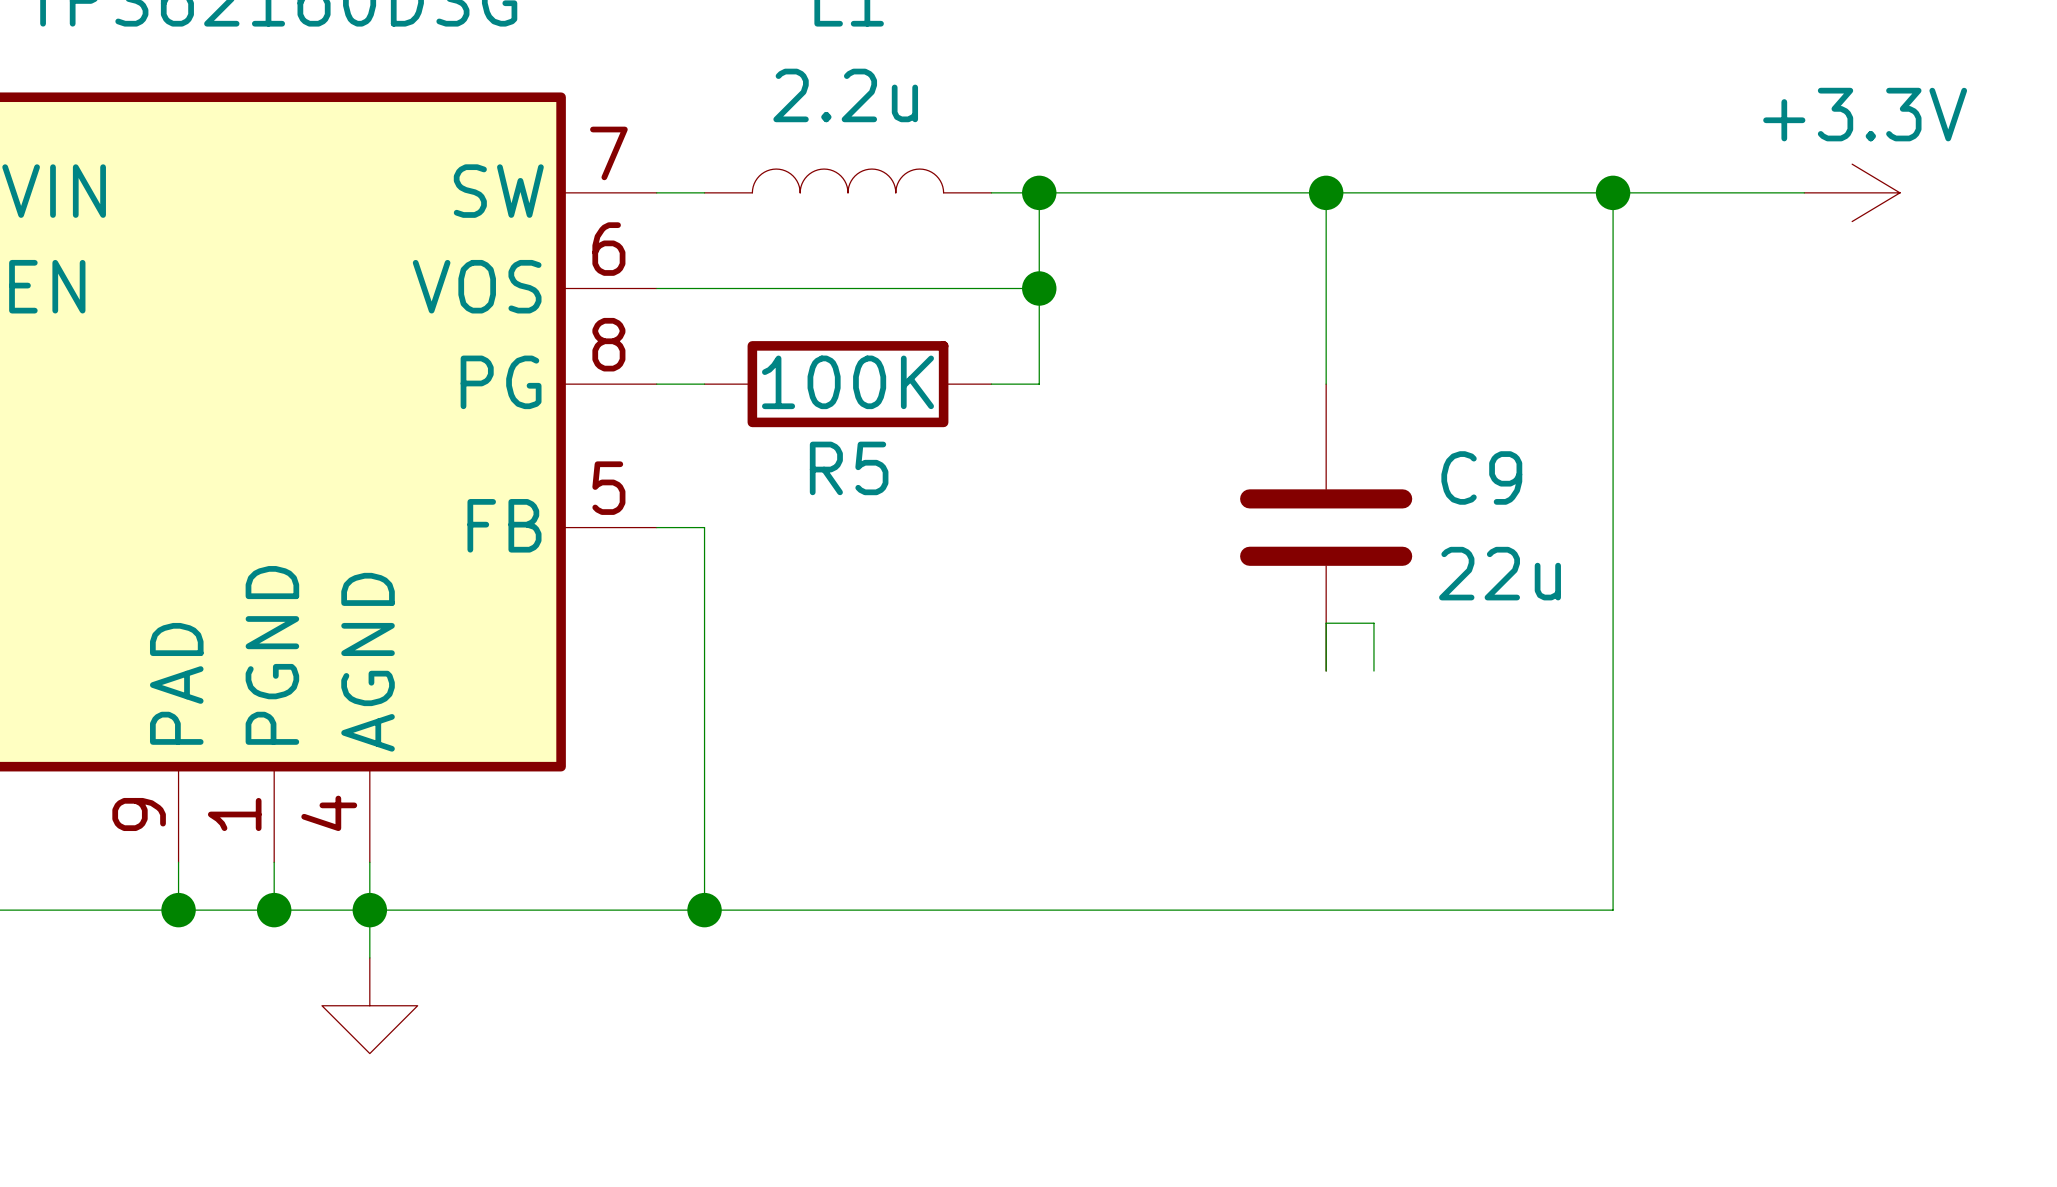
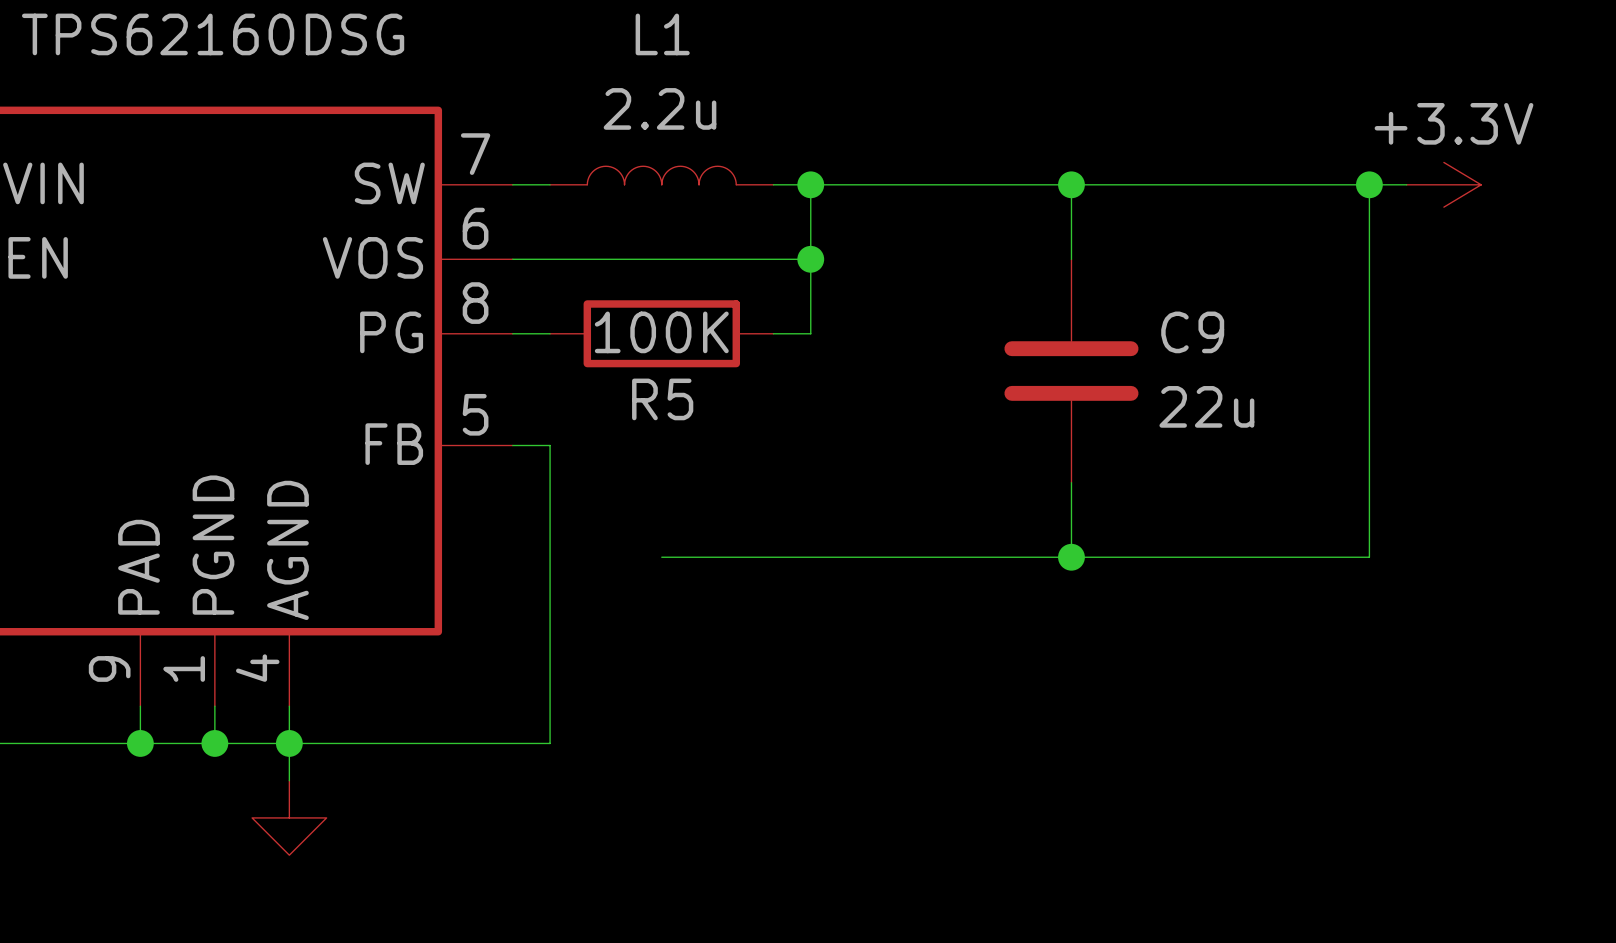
wire: (1326, 192) (1326, 384) -> none
junction position: (1326, 192) -> (1071, 184)
wire: none -> (1071, 184) (1071, 259)
wire: (1613, 192) (1613, 910) (704, 910) -> none
junction: (1613, 192) -> none
wire: none -> (1369, 184) (1369, 557) (661, 557)
junction: none -> (1369, 184)
C9 position: (1326, 527) -> (1071, 371)
wire: (1373, 623) (1326, 623) (1326, 671) -> (1071, 520) (1071, 482)
junction: none -> (1071, 557)
junction: (704, 910) -> none

